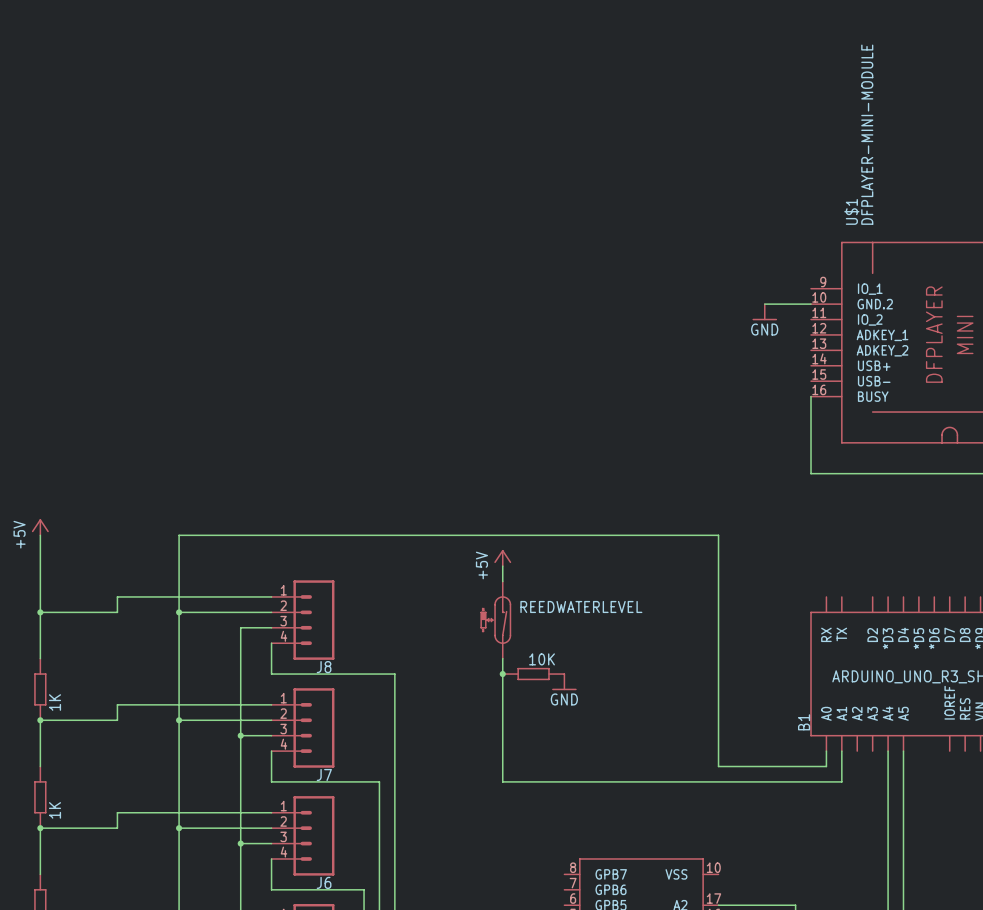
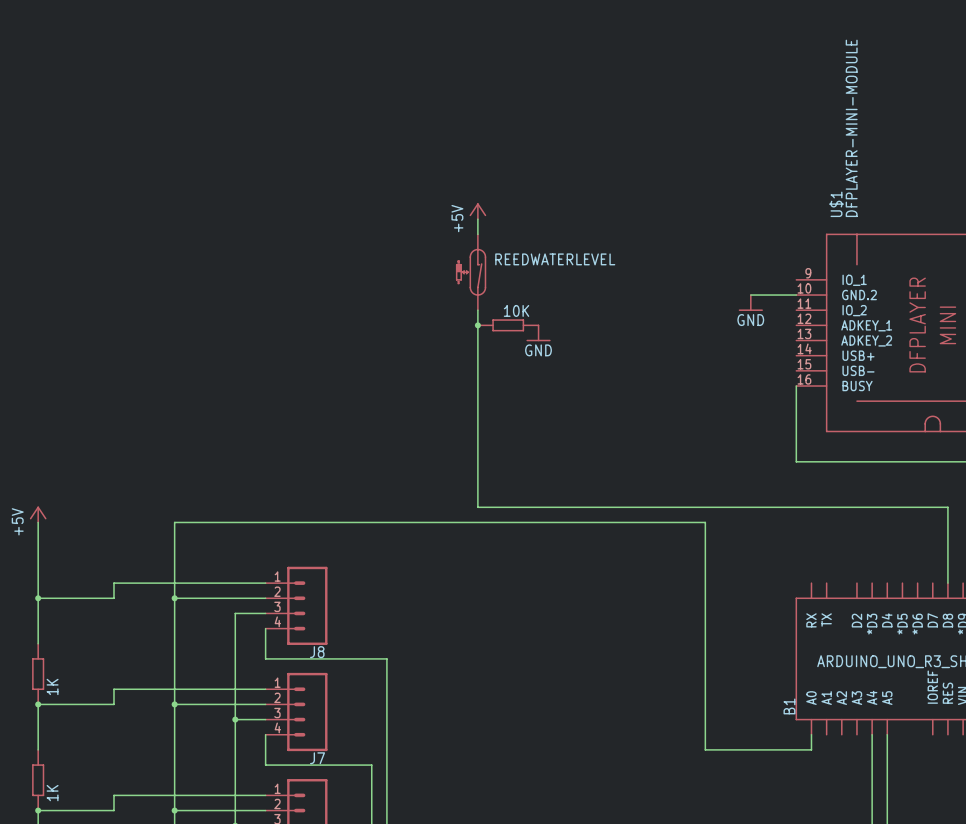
power symbol: none -> +5V (477, 211)
wire: none -> (477, 219) (477, 234)
REEDWATERLEVEL: none -> (471, 272)
wire: none -> (477, 310) (477, 507) (947, 507) (947, 583)
junction: none -> (477, 325)
part: none -> 10K (508, 325)
power symbol: none -> GND (538, 333)
power symbol: +5V (502, 558) -> none
wire: (502, 566) (502, 581) -> none
REEDWATERLEVEL: (495, 620) -> none
wire: (502, 658) (502, 781) (841, 781) (841, 751) -> none
junction: (502, 674) -> none
part: 10K (533, 674) -> none
power symbol: GND (564, 682) -> none

